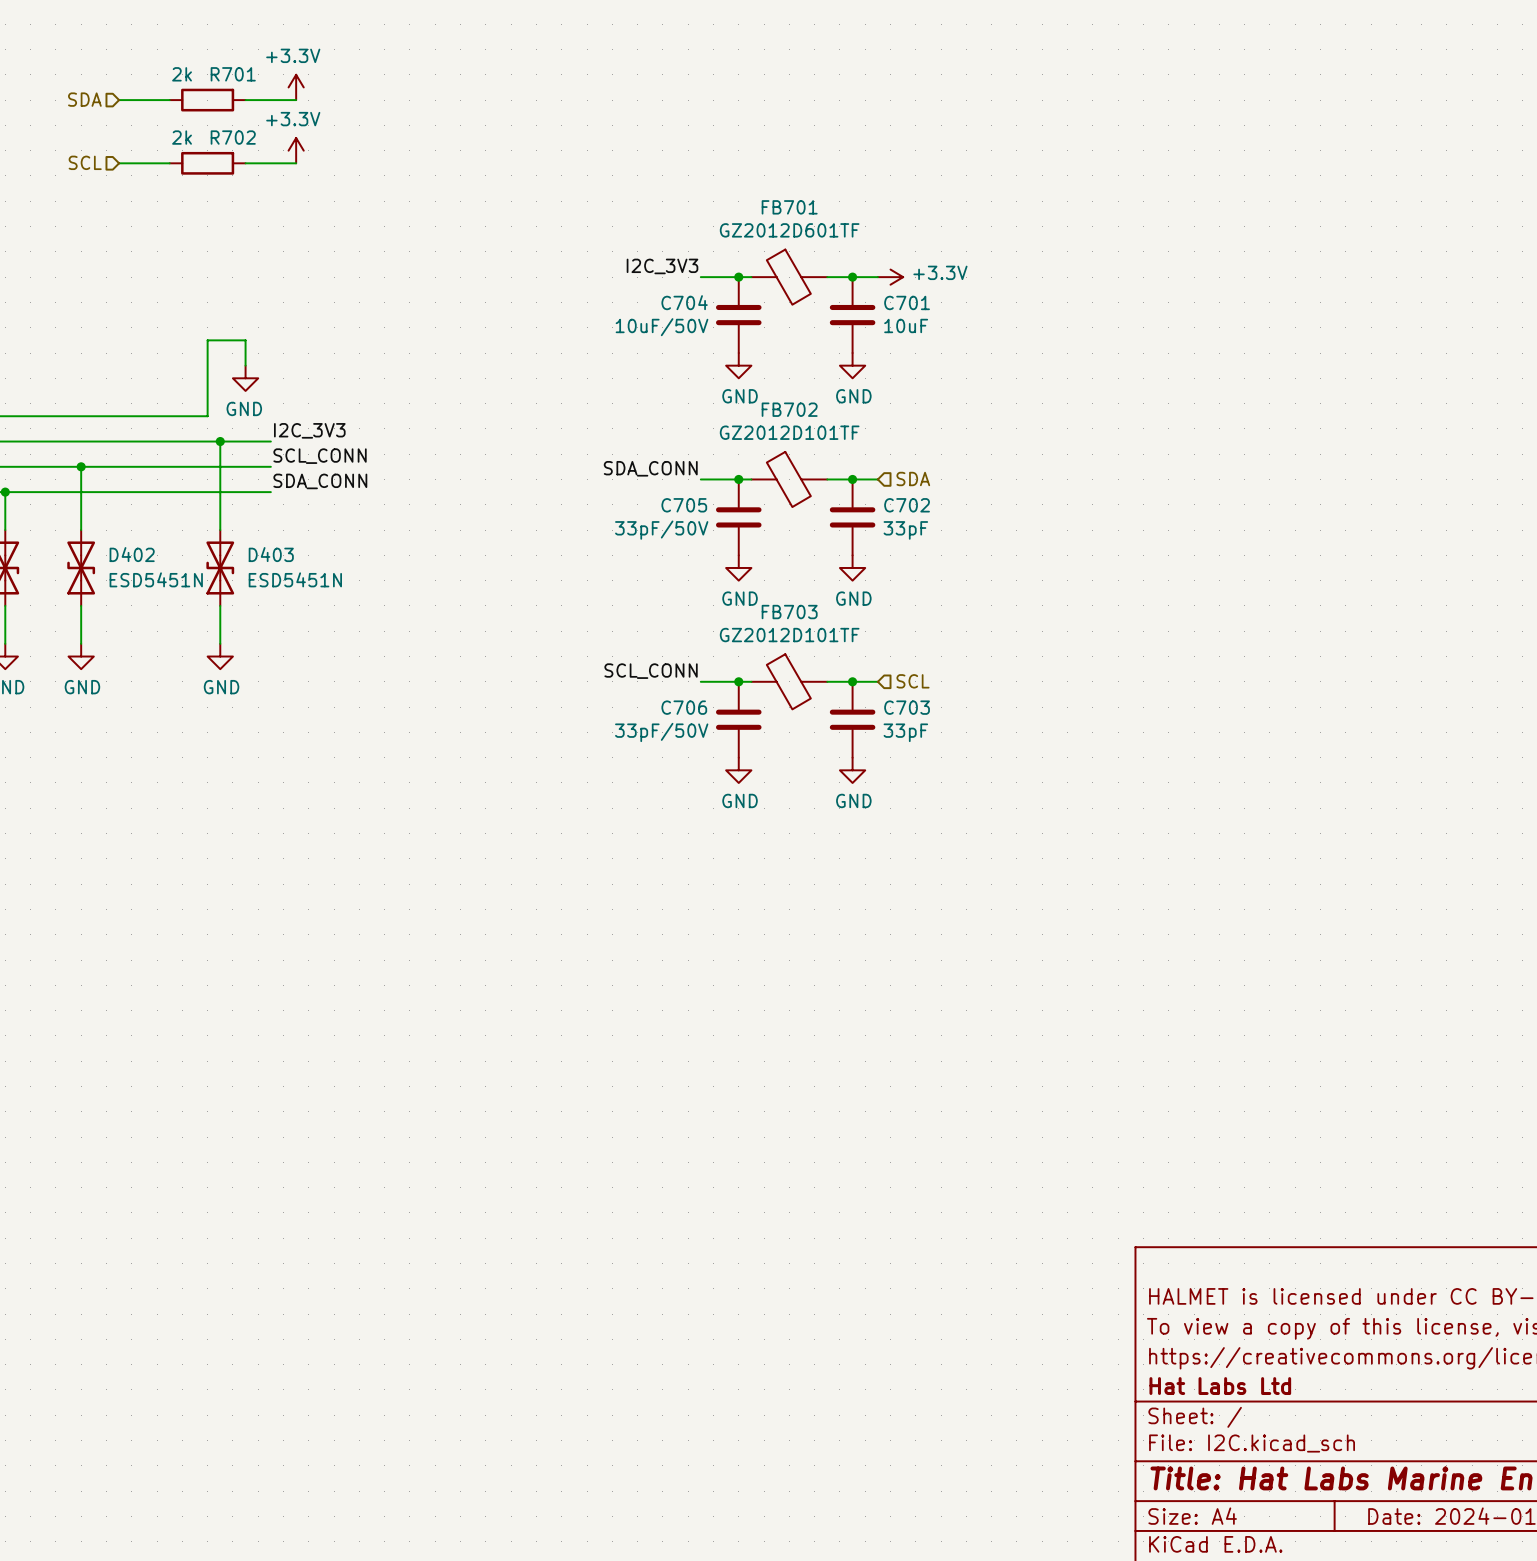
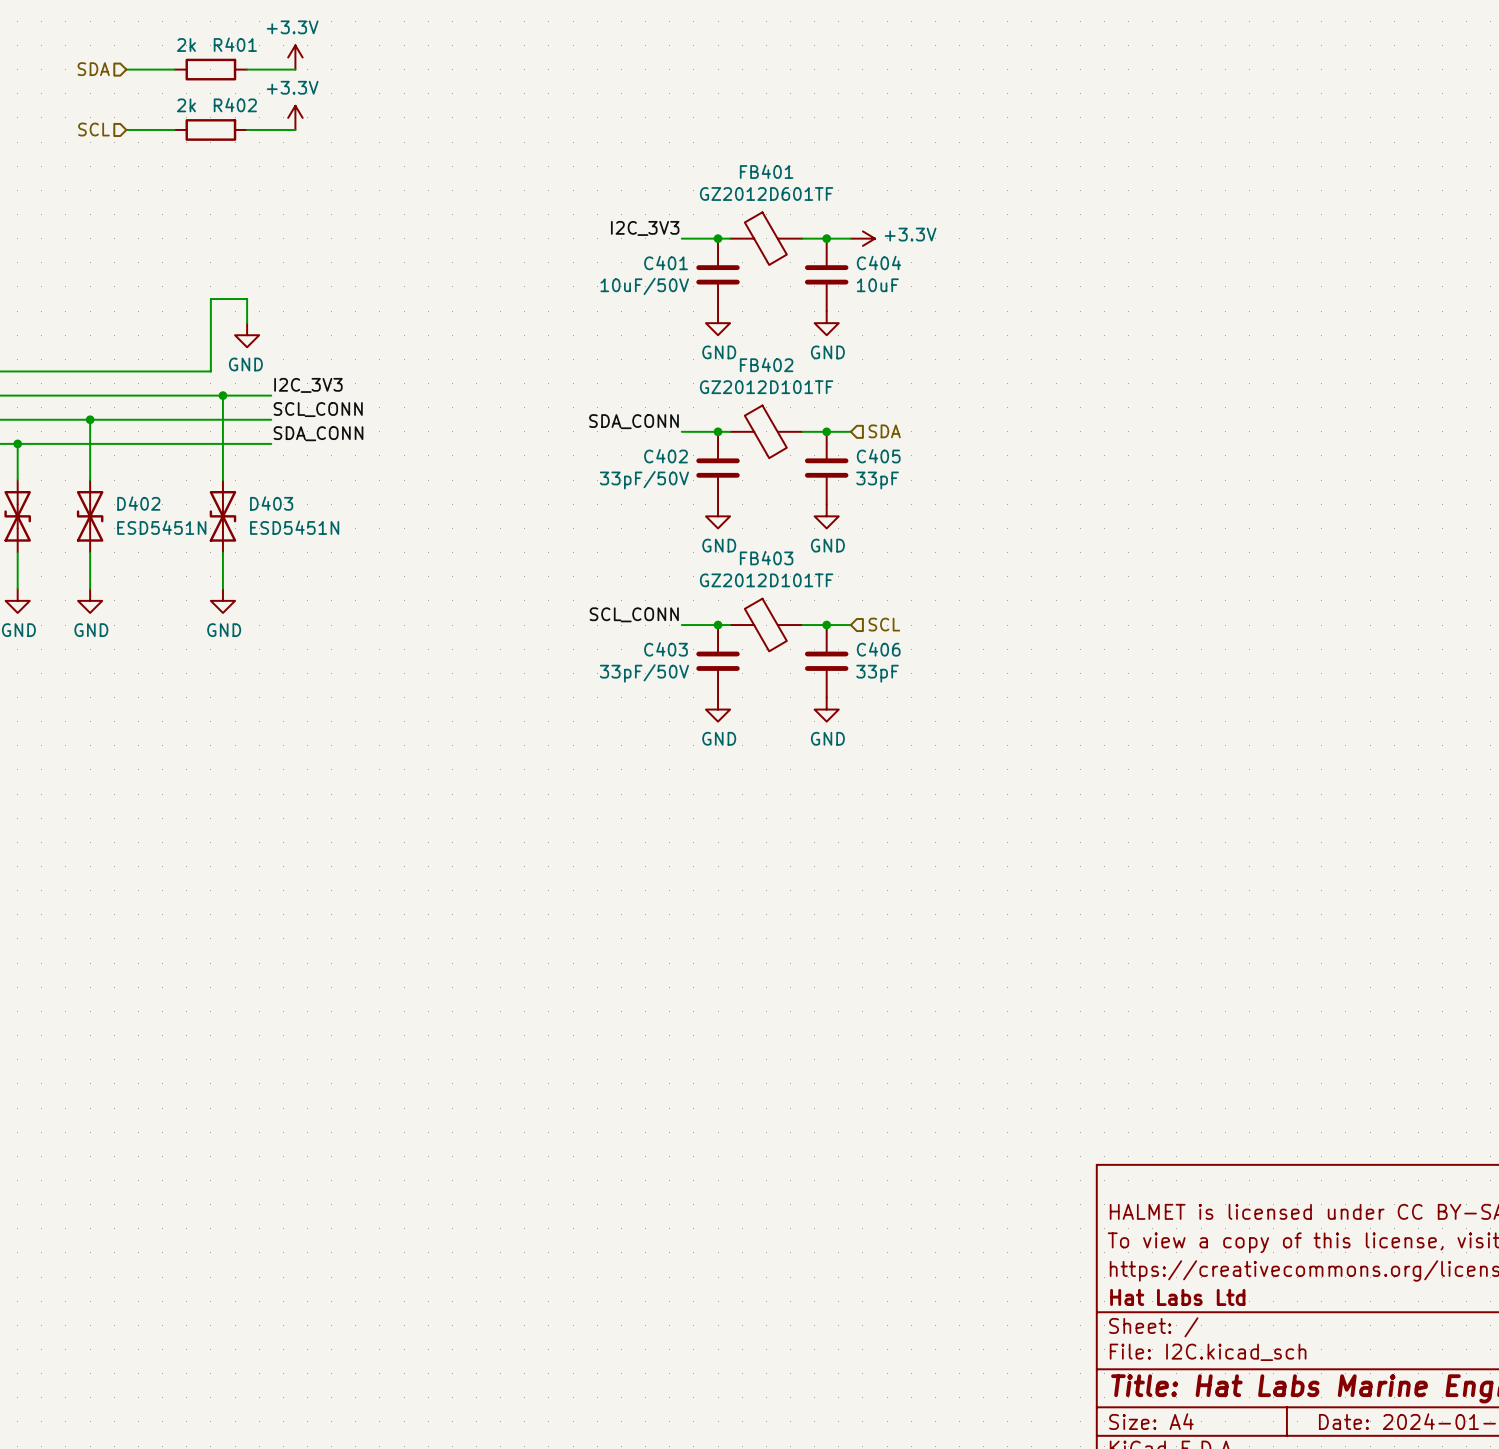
R701 name: R701 (233, 74) -> R401 (235, 44)
R702 name: R702 (233, 137) -> R402 (235, 105)
FB701 name: FB701 (789, 207) -> FB401 (766, 171)
C704 name: C704 (684, 302) -> C401 (666, 263)
C701 name: C701 (907, 302) -> C404 (878, 263)
FB702 name: FB702 (789, 409) -> FB402 (766, 364)
C705 name: C705 (684, 505) -> C402 (666, 456)
C702 name: C702 (907, 505) -> C405 (878, 456)
FB703 name: FB703 (789, 612) -> FB403 (766, 558)
C706 name: C706 (684, 707) -> C403 (666, 649)
C703 name: C703 (907, 707) -> C406 (878, 649)

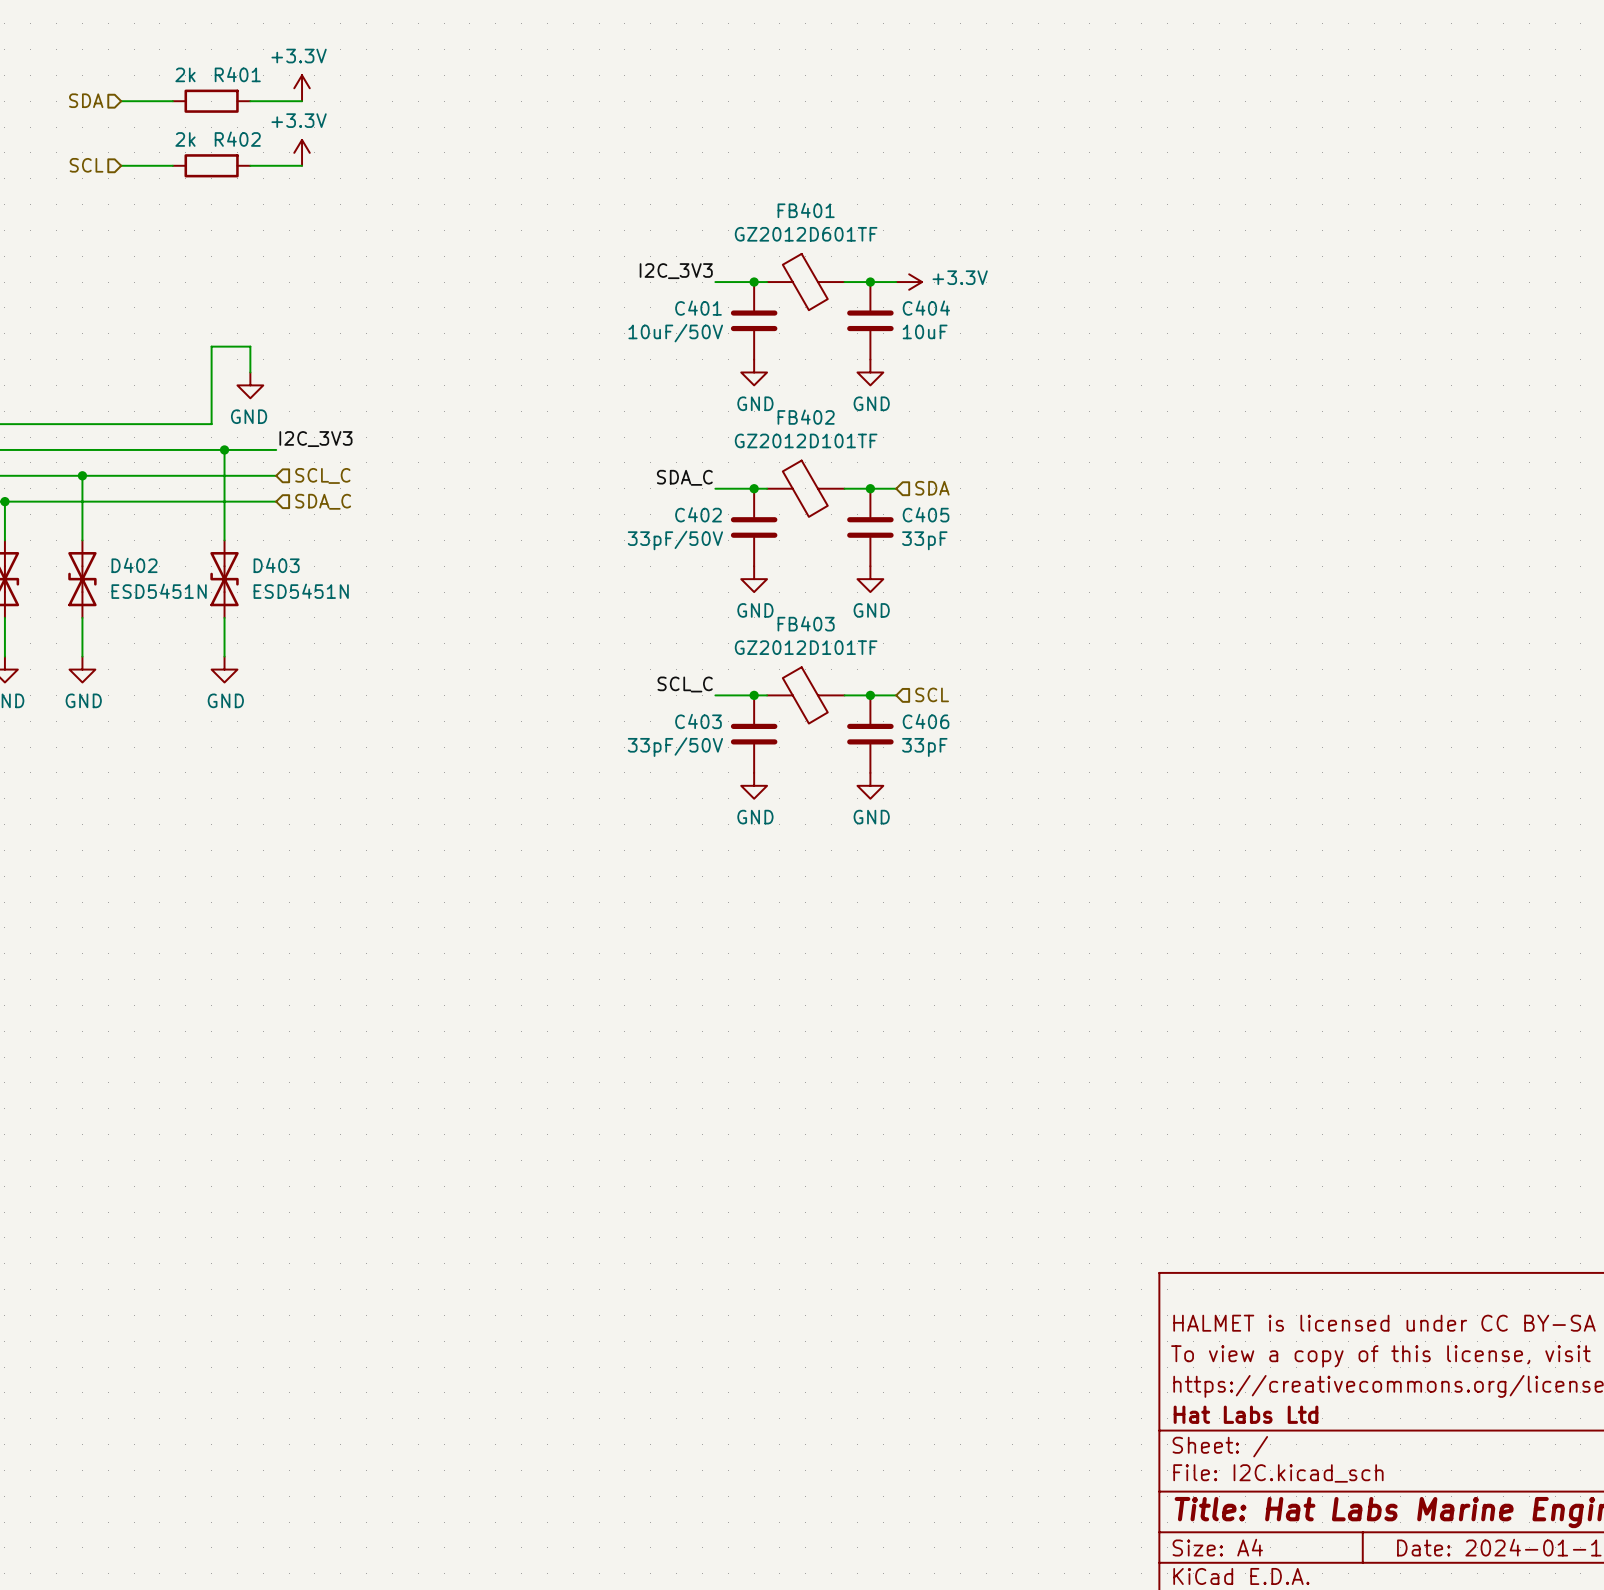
label: SCL_CONN (318, 409) -> none
hierarchical label: none -> SCL_C (322, 475)
label: SDA_CONN (633, 421) -> SDA_C (684, 477)
label: SDA_CONN (318, 433) -> none
hierarchical label: none -> SDA_C (323, 501)
label: SCL_CONN (634, 614) -> SCL_C (685, 684)

